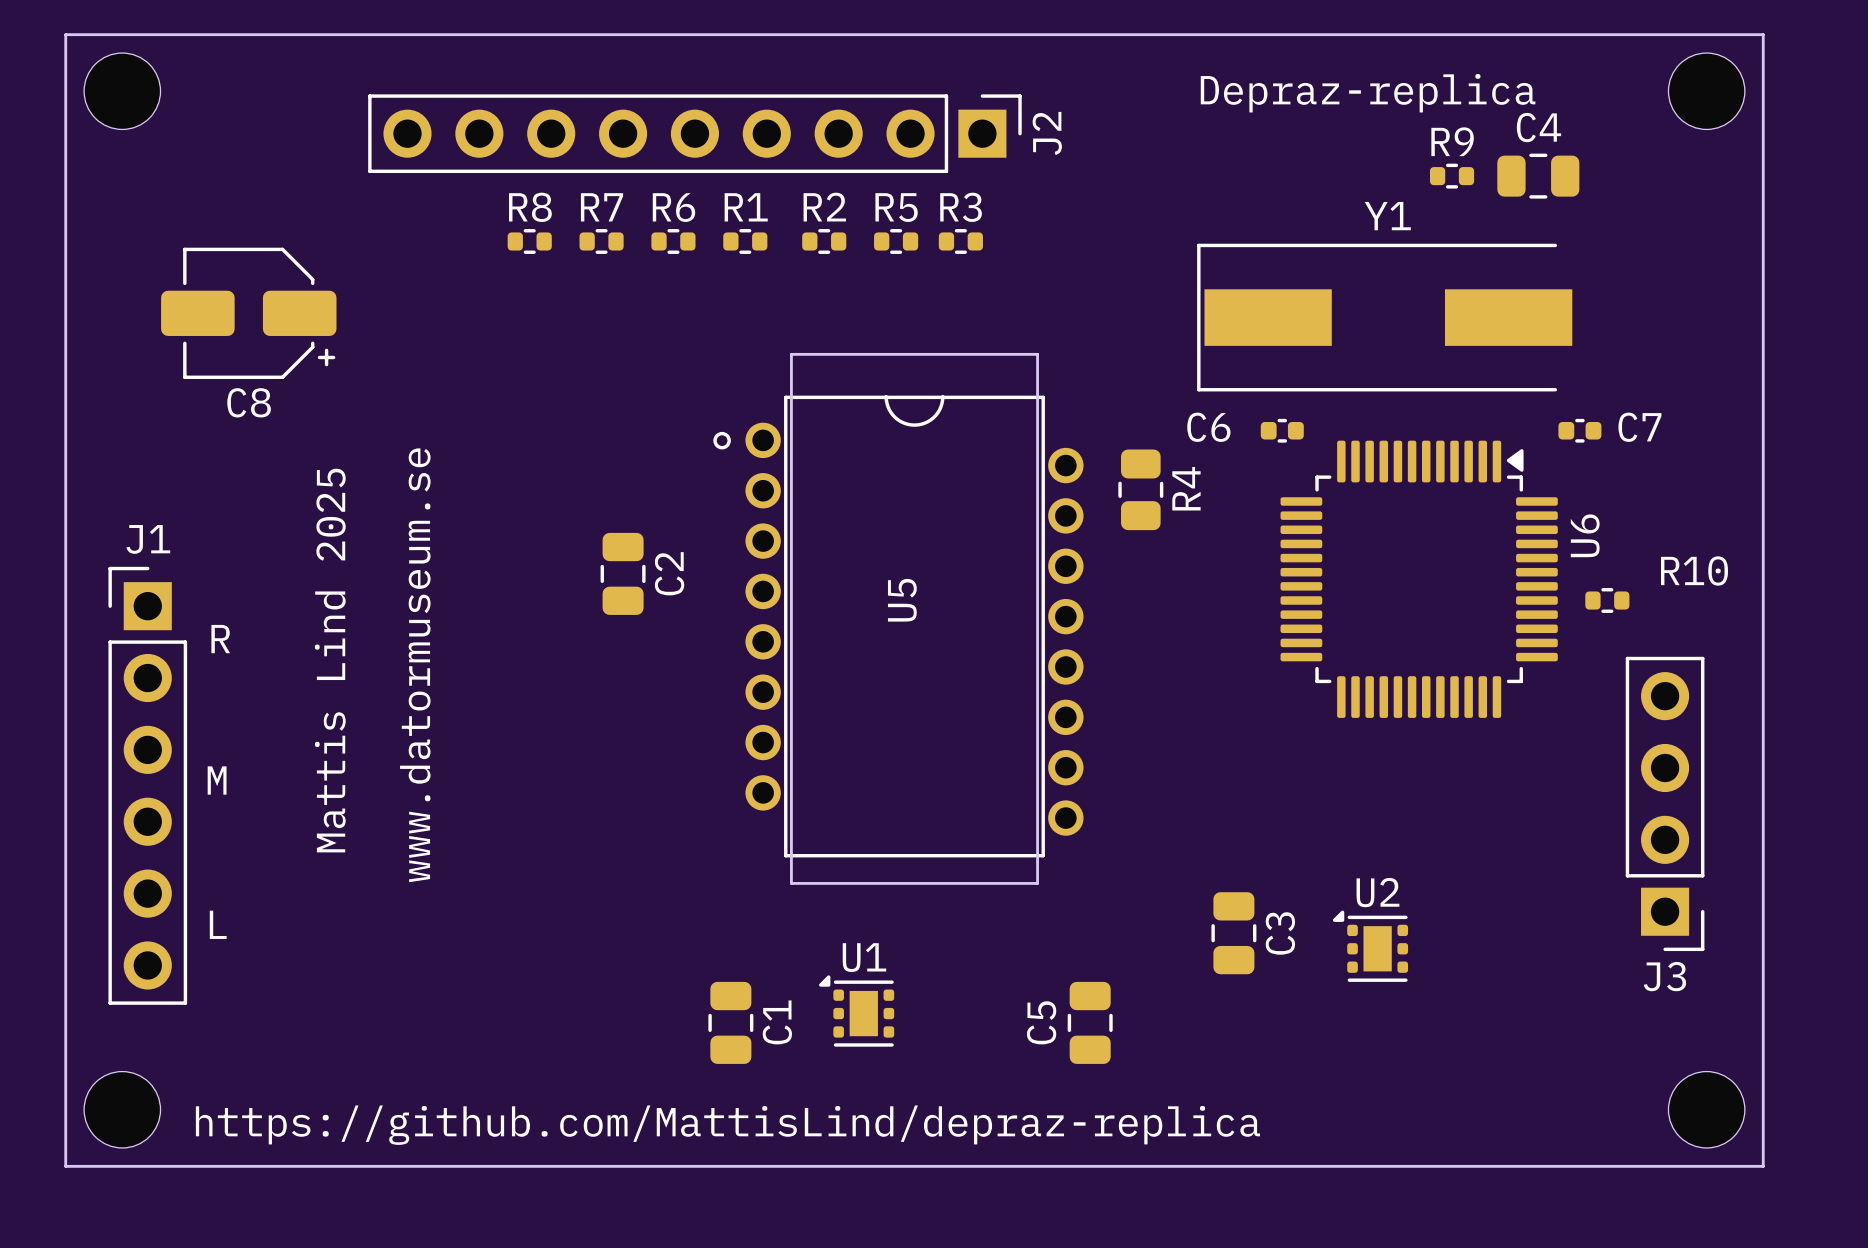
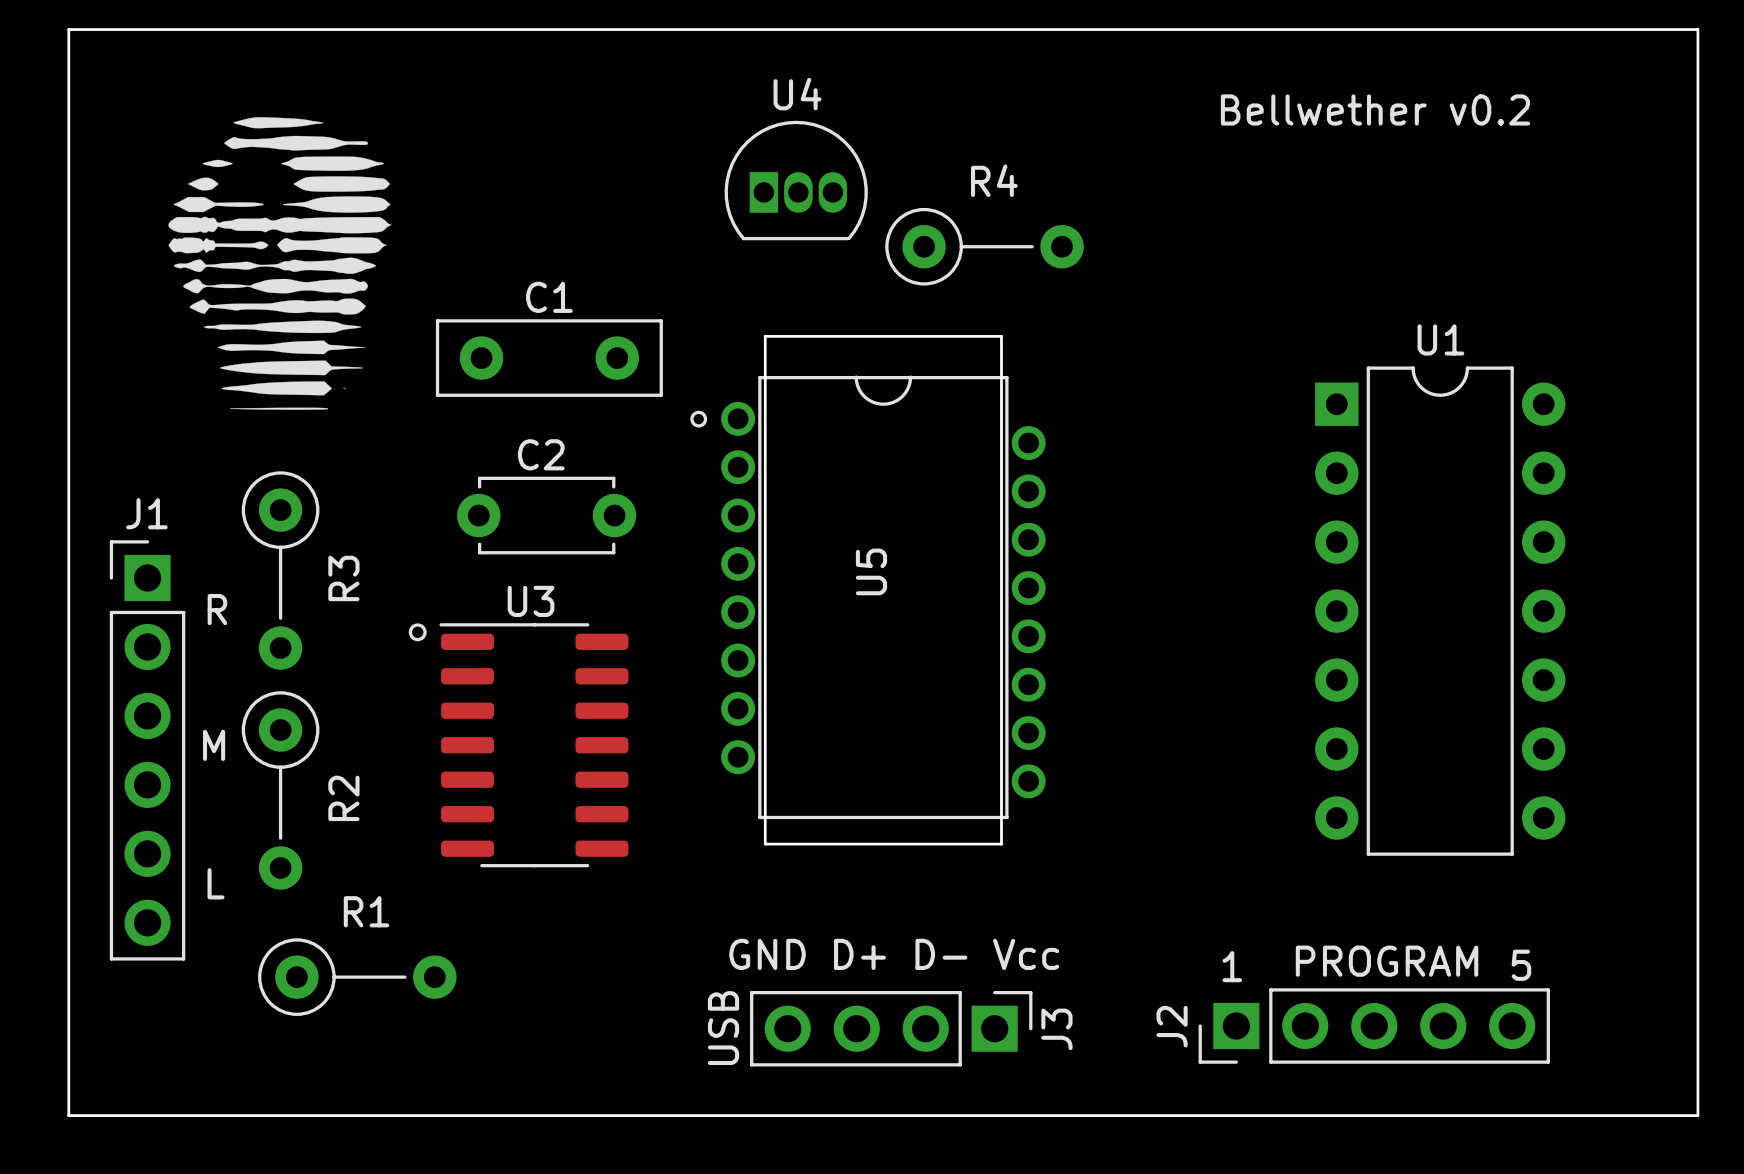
part: (122, 91) -> none
part: (1706, 91) -> none
text: Depraz-replica (1368, 93) -> none
J2 footprint: [368, 94, 1022, 174] -> [1198, 988, 1550, 1064]
text: none -> Bellwether v0.2 (1375, 109)
drawing: none -> [168, 117, 392, 410]
J2 name position: J2 (1047, 133) -> J2 (1172, 1026)
R9: (1452, 176) -> none
C4: (1538, 176) -> none
U4: none -> (796, 180)
R2 name position: R2 (824, 207) -> R2 (343, 798)
R3 name position: R3 (961, 207) -> R3 (343, 578)
R1 footprint: [723, 229, 768, 254] -> [258, 938, 457, 1016]
R2 footprint: [802, 229, 847, 254] -> [241, 691, 320, 890]
R3 footprint: [938, 229, 983, 254] -> [241, 471, 320, 670]
R8: (529, 241) -> none
R7: (601, 241) -> none
R6: (673, 241) -> none
R5: (896, 241) -> none
C8: (248, 313) -> none
Y1: (1384, 317) -> none
C6: (1282, 430) -> none
C7: (1579, 430) -> none
R4 footprint: [1118, 449, 1164, 531] -> [885, 207, 1084, 286]
R4 name position: R4 (1186, 488) -> R4 (994, 180)
C2 footprint: [600, 532, 646, 615] -> [457, 476, 637, 555]
C2 name position: C2 (669, 573) -> C2 (541, 454)
U6: (1419, 579) -> none
R10: (1607, 600) -> none
drawing: none -> [408, 623, 427, 642]
text: Mattis Lind 2025 (330, 660) -> none
text: www.datormuseum.se (415, 665) -> none
U3: none -> (533, 745)
J3 rotation: 0° (1665, 803) -> 90° counterclockwise (891, 1028)
J3 position: (1665, 803) -> (891, 1028)
C3: (1233, 933) -> none
U2: (1370, 946) -> none
U1 name position: U1 (864, 957) -> U1 (1440, 339)
U1 footprint: [819, 975, 895, 1047] -> [1315, 366, 1566, 856]
C1 footprint: [708, 981, 754, 1064] -> [435, 319, 663, 397]
text: none -> GND D+ D- Vcc (894, 954)
text: none -> PROGRAM (1387, 961)
text: none -> 5 (1521, 965)
text: none -> 1 (1232, 966)
C1 name position: C1 (777, 1022) -> C1 (549, 297)
C5: (1090, 1022) -> none
text: none -> USB (723, 1028)
part: (122, 1109) -> none
part: (1706, 1109) -> none
text: https://github.com/MattisLind/depraz-replica (727, 1125) -> none

